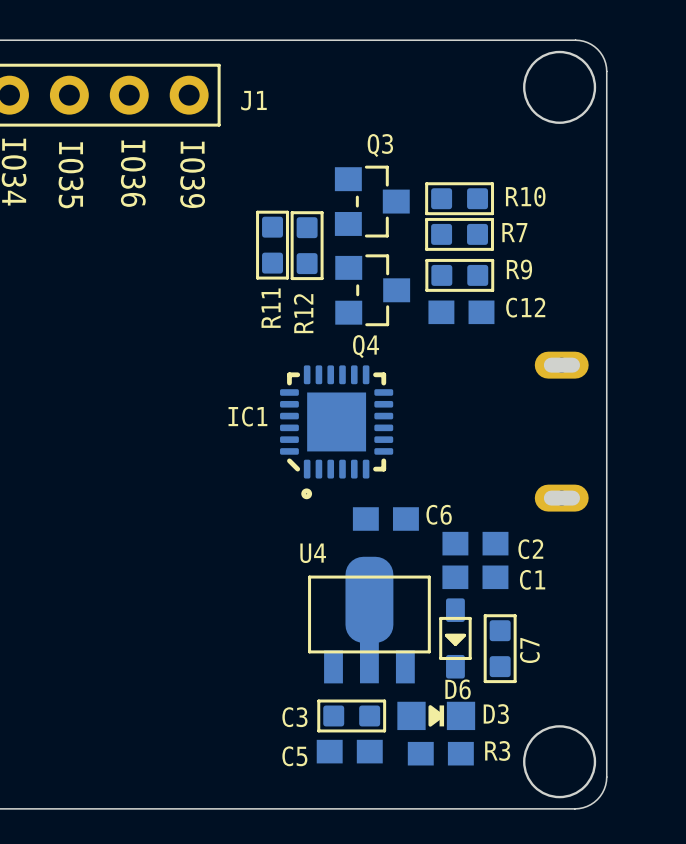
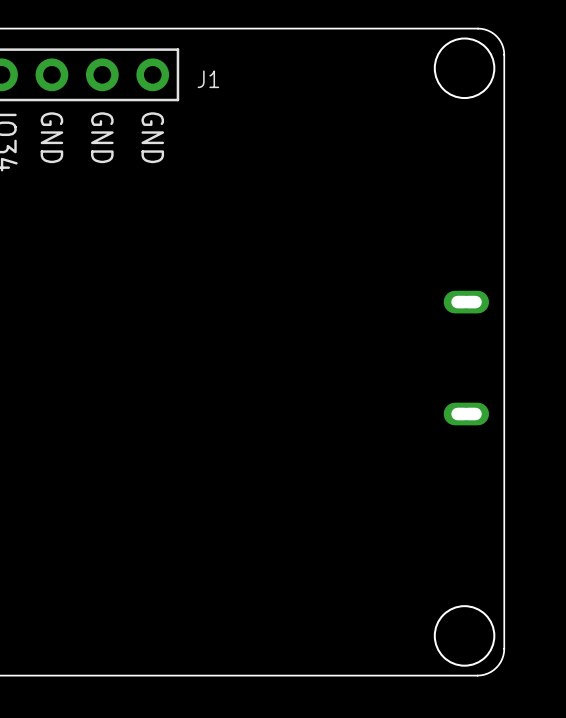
text: IO36 (133, 173) -> GND (102, 137)
text: IO39 (192, 174) -> GND (152, 137)
text: IO35 (71, 175) -> GND (51, 137)
R10: (459, 198) -> none
Q3: (372, 201) -> none
R7: (459, 234) -> none
R11: (272, 245) -> none
R12: (307, 245) -> none
R9: (459, 275) -> none
Q4: (372, 290) -> none
C12: (461, 312) -> none
IC1: (336, 432) -> none
C6: (385, 519) -> none
C2: (475, 543) -> none
C1: (475, 577) -> none
U4: (369, 620) -> none
D6: (455, 638) -> none
C7: (500, 648) -> none
C3: (351, 715) -> none
D3: (436, 715) -> none
C5: (349, 751) -> none
R3: (440, 753) -> none

